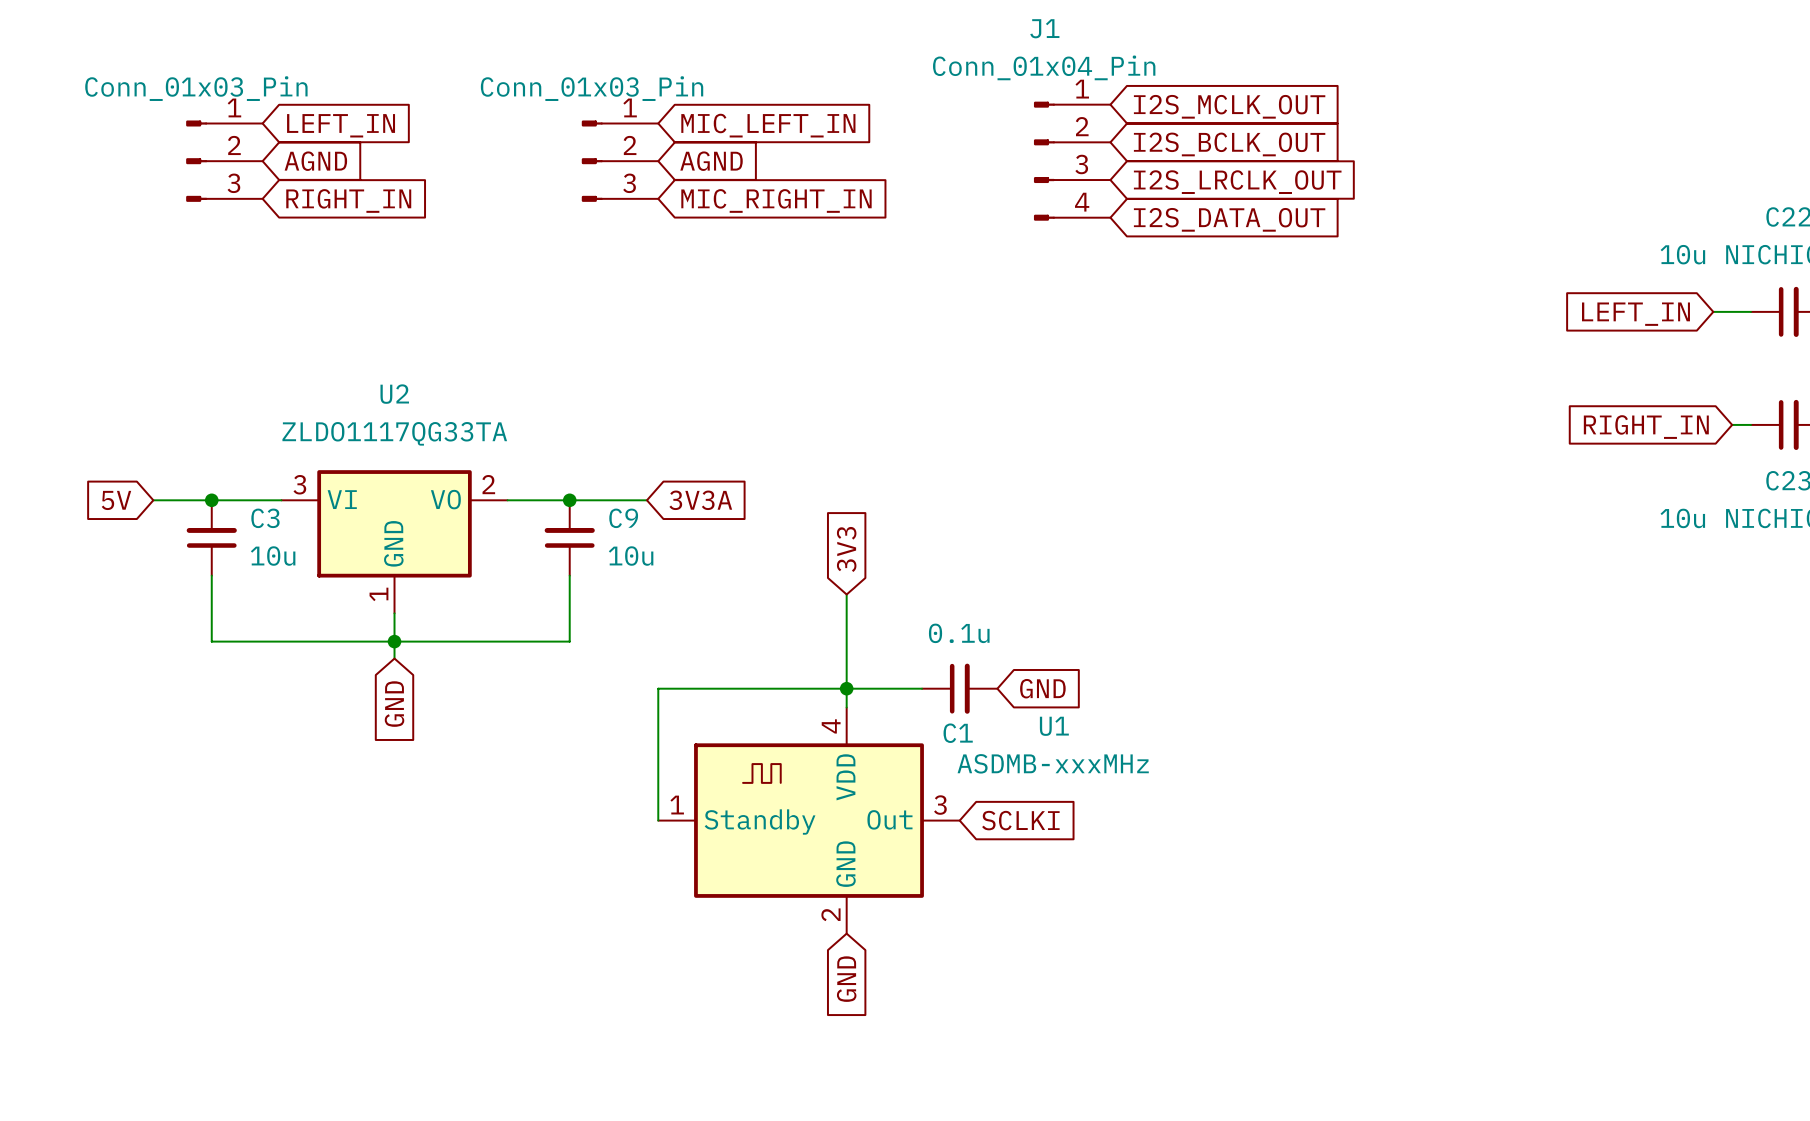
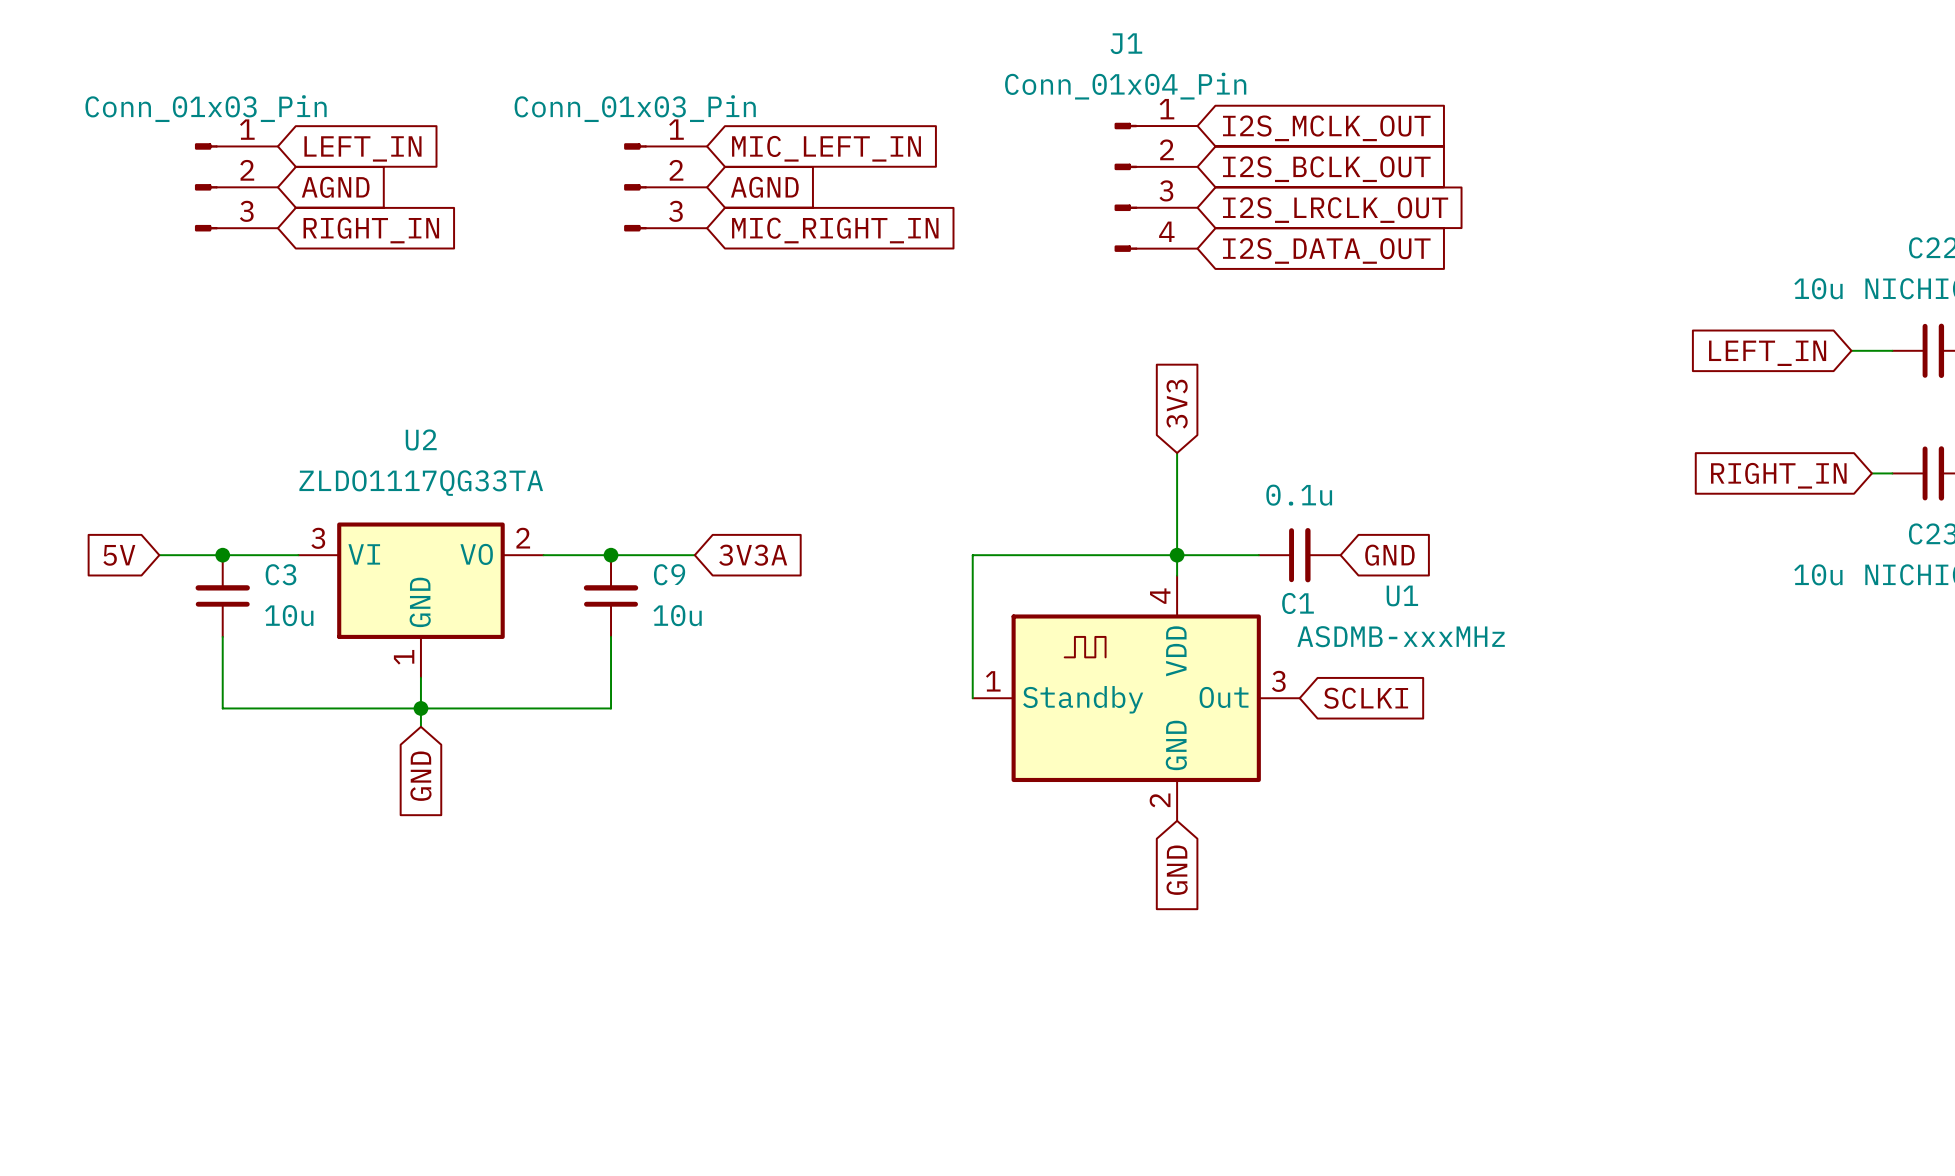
junction: none -> (1177, 555)
global label: none -> GND (1389, 555)
global label position: 3V3 (846, 549) -> 3V3 (1177, 404)
wire: (846, 594) (846, 707) -> (1177, 453) (1177, 575)
junction: (846, 688) -> none
wire: (922, 688) (658, 688) (658, 820) -> (1258, 555) (972, 555) (972, 698)
C1 position: (959, 688) -> (1299, 555)
global label rotation: 0° (1042, 688) -> 90° clockwise (1177, 870)
global label position: GND (1042, 688) -> GND (1177, 870)
U1 position: (808, 820) -> (1136, 698)
global label position: SCLKI (1020, 820) -> SCLKI (1366, 698)
global label: GND (846, 979) -> none

